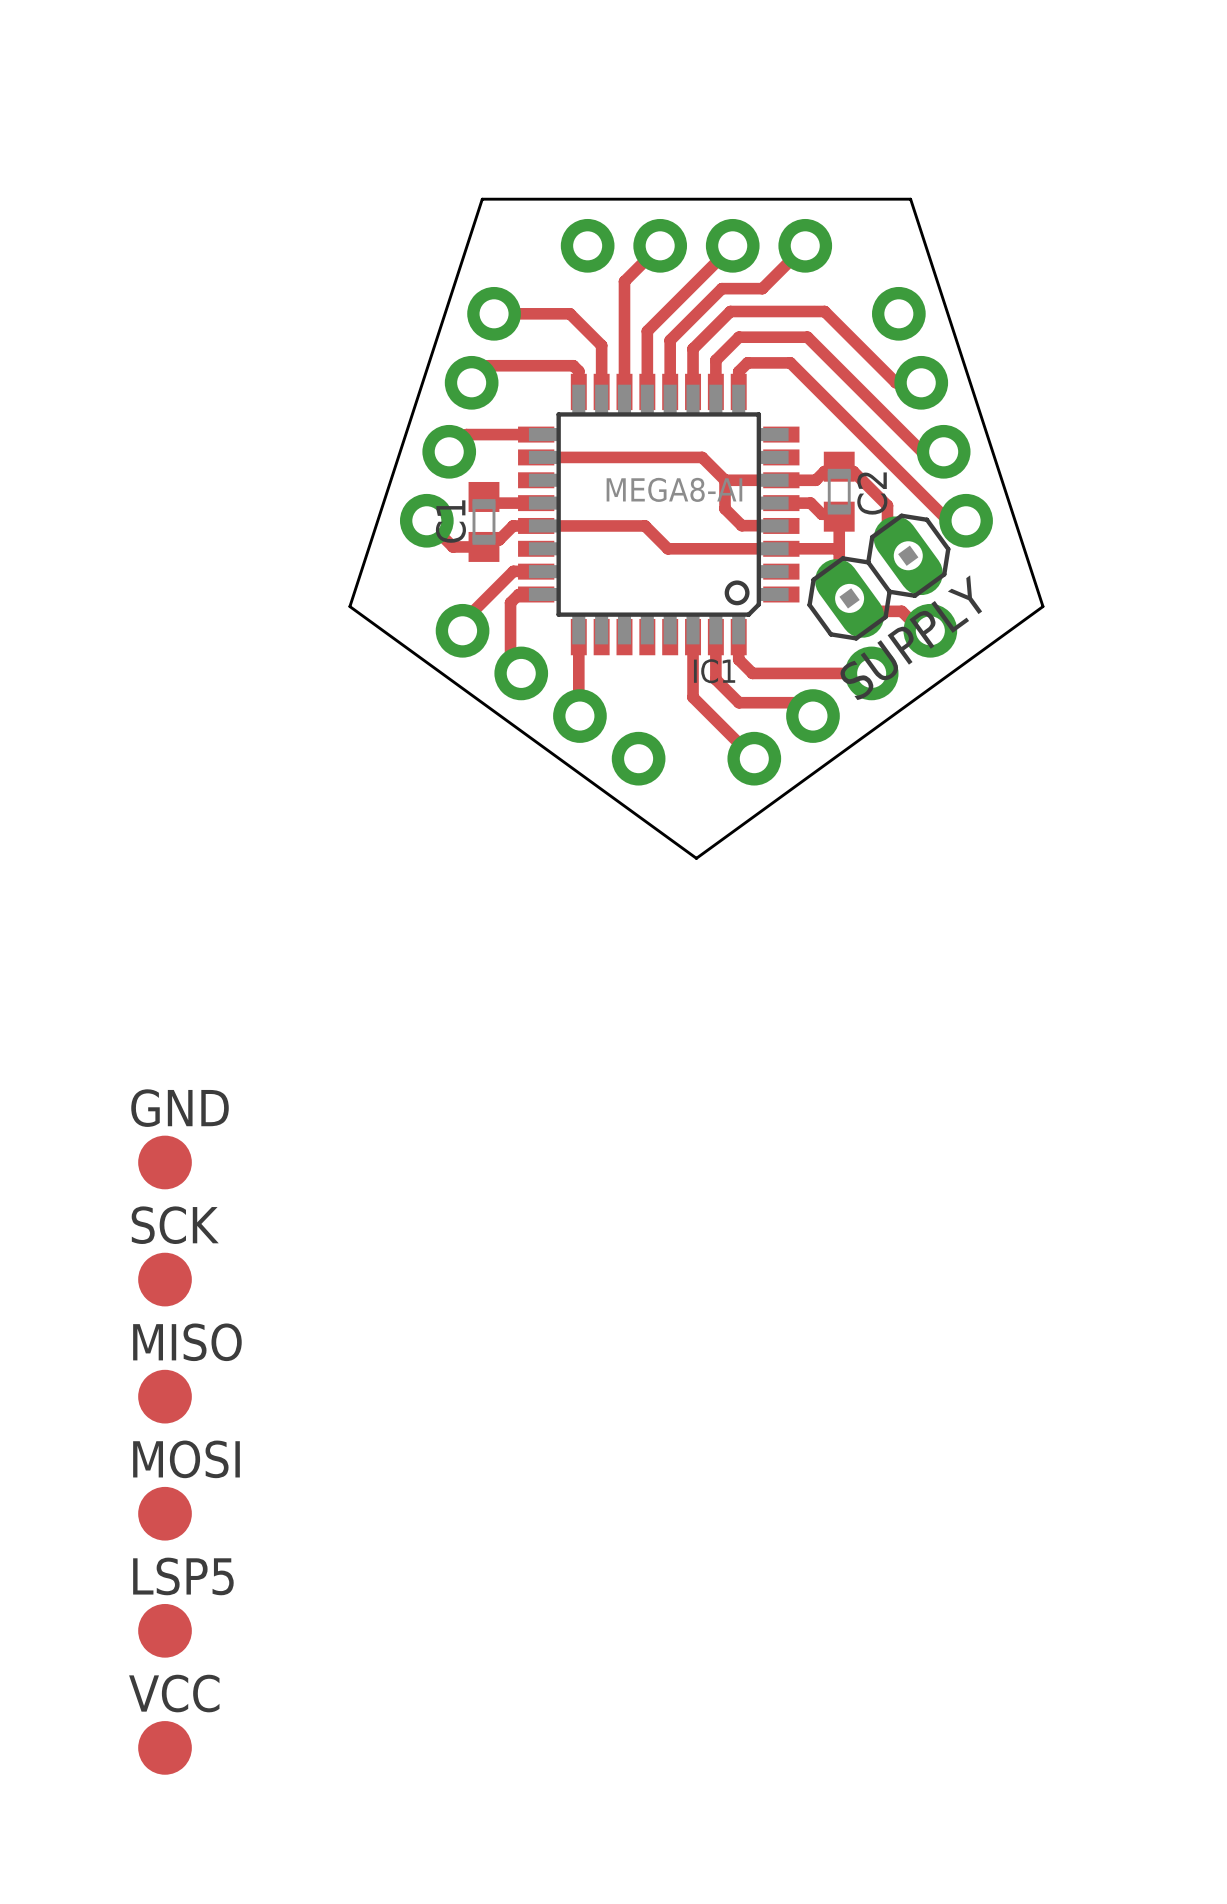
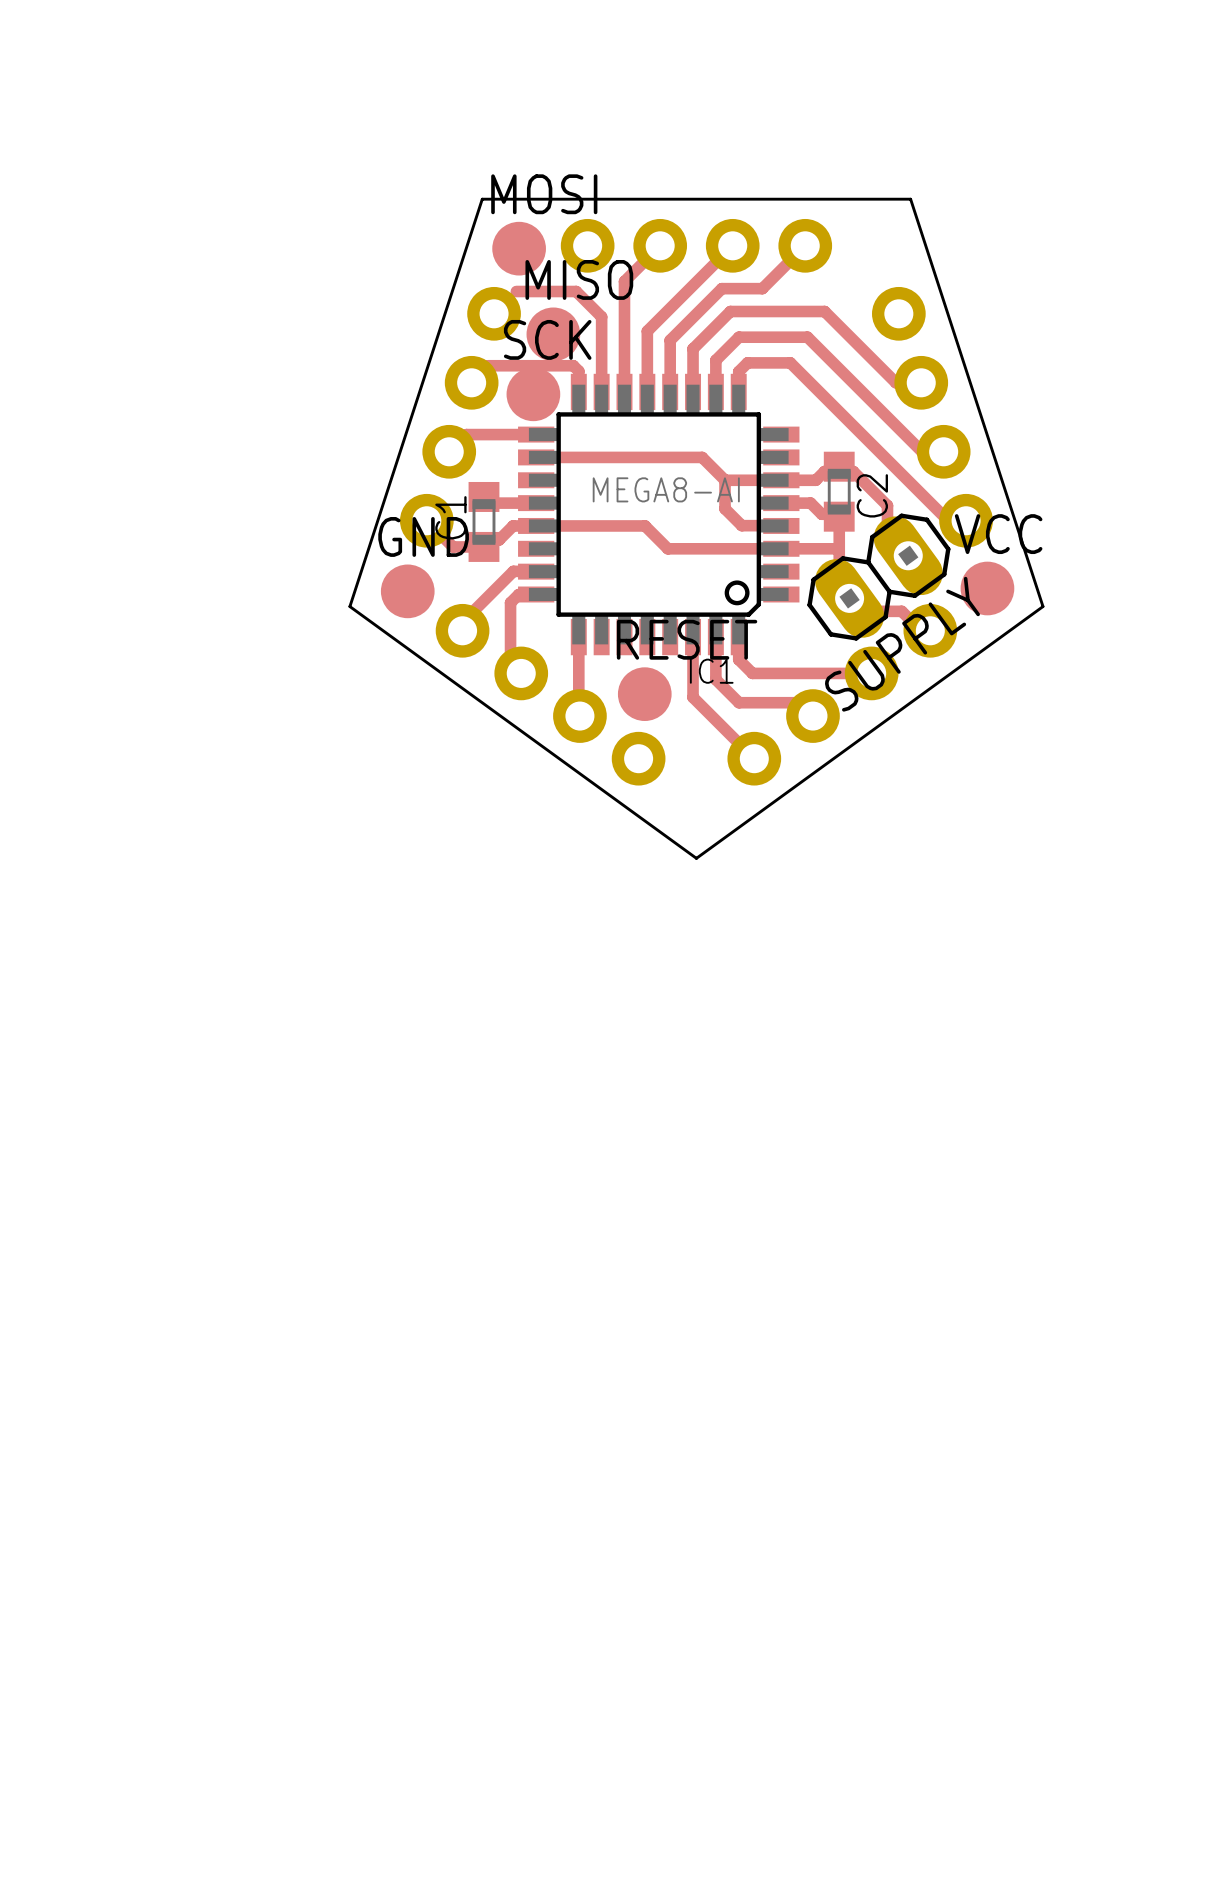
MOSI: none -> (519, 248)
top track: (494, 313) (569, 313) (601, 345) -> (516, 291) (576, 291) (601, 316) (601, 345)
MISO: none -> (553, 334)
SCK: none -> (533, 394)
VCC: none -> (987, 588)
RESET: none -> (644, 694)
GND position: (165, 1162) -> (407, 591)
SCK: (165, 1279) -> none
MISO: (165, 1396) -> none
MOSI: (165, 1513) -> none
LSP5: (165, 1630) -> none
VCC: (165, 1747) -> none

